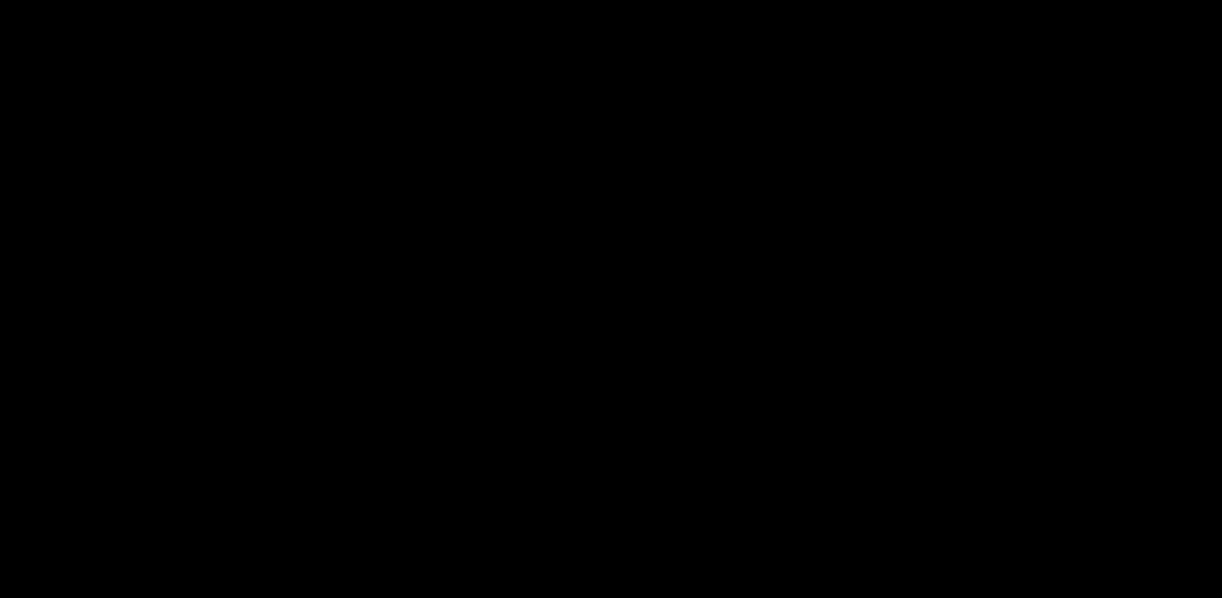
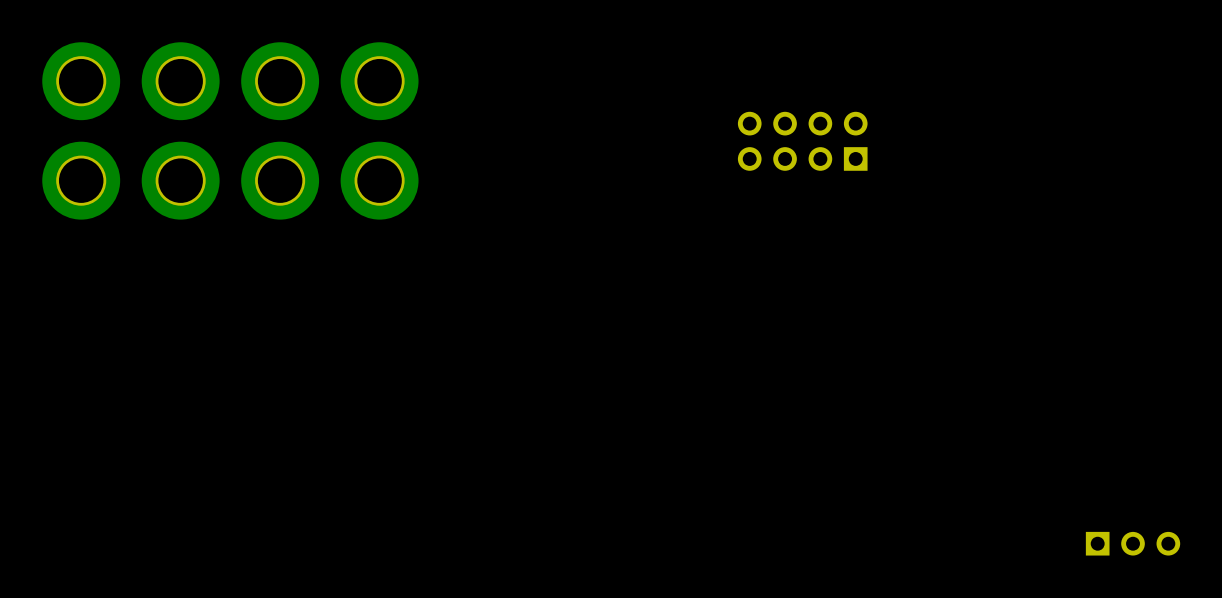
part: none -> (81, 81)
part: none -> (180, 81)
part: none -> (280, 81)
part: none -> (379, 81)
part: none -> (802, 141)
part: none -> (81, 180)
part: none -> (180, 180)
part: none -> (280, 180)
part: none -> (379, 180)
part: none -> (1133, 543)

